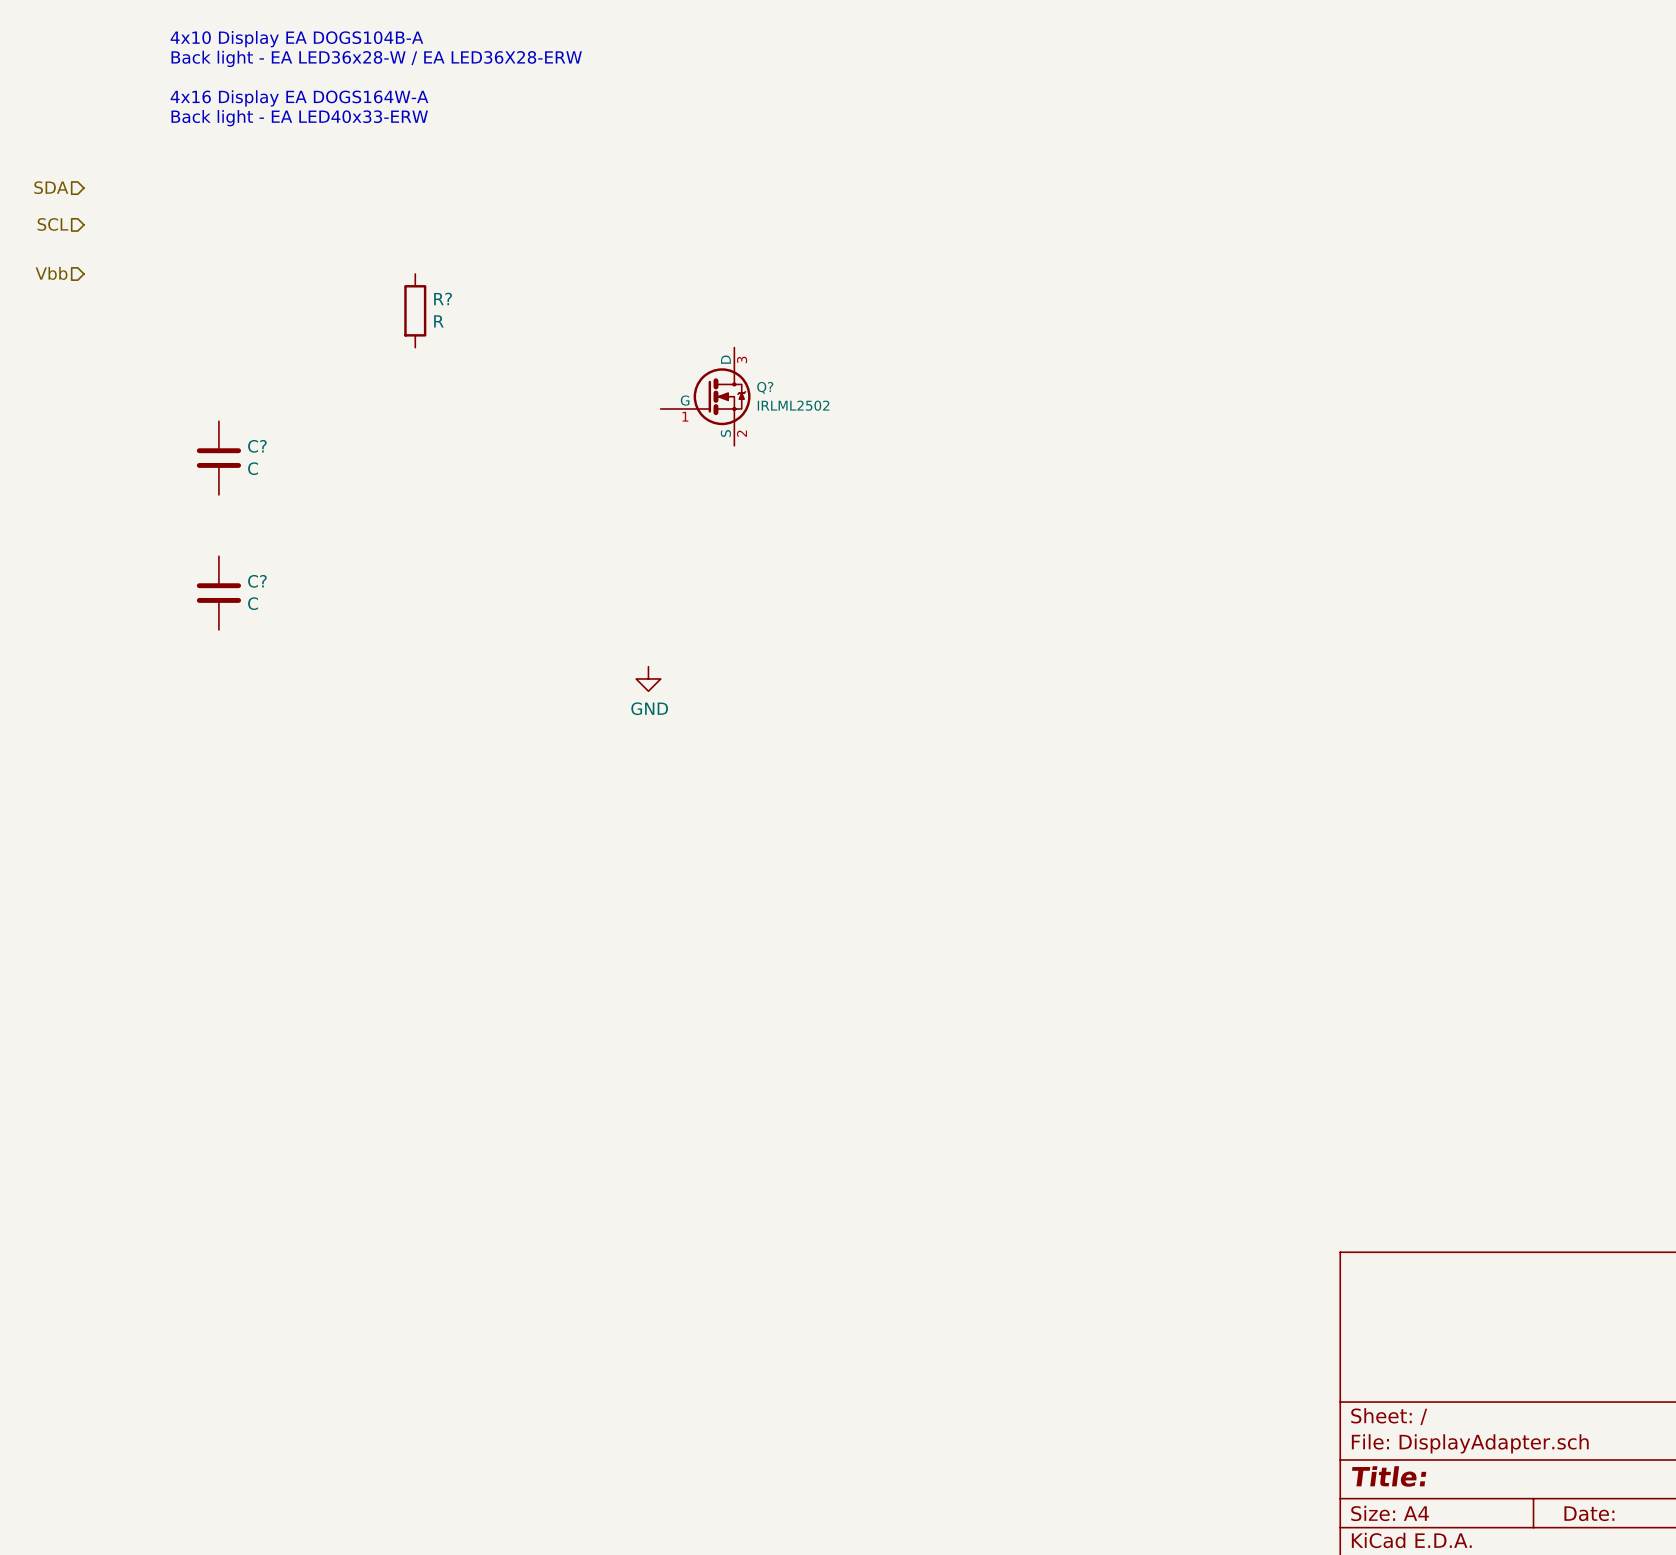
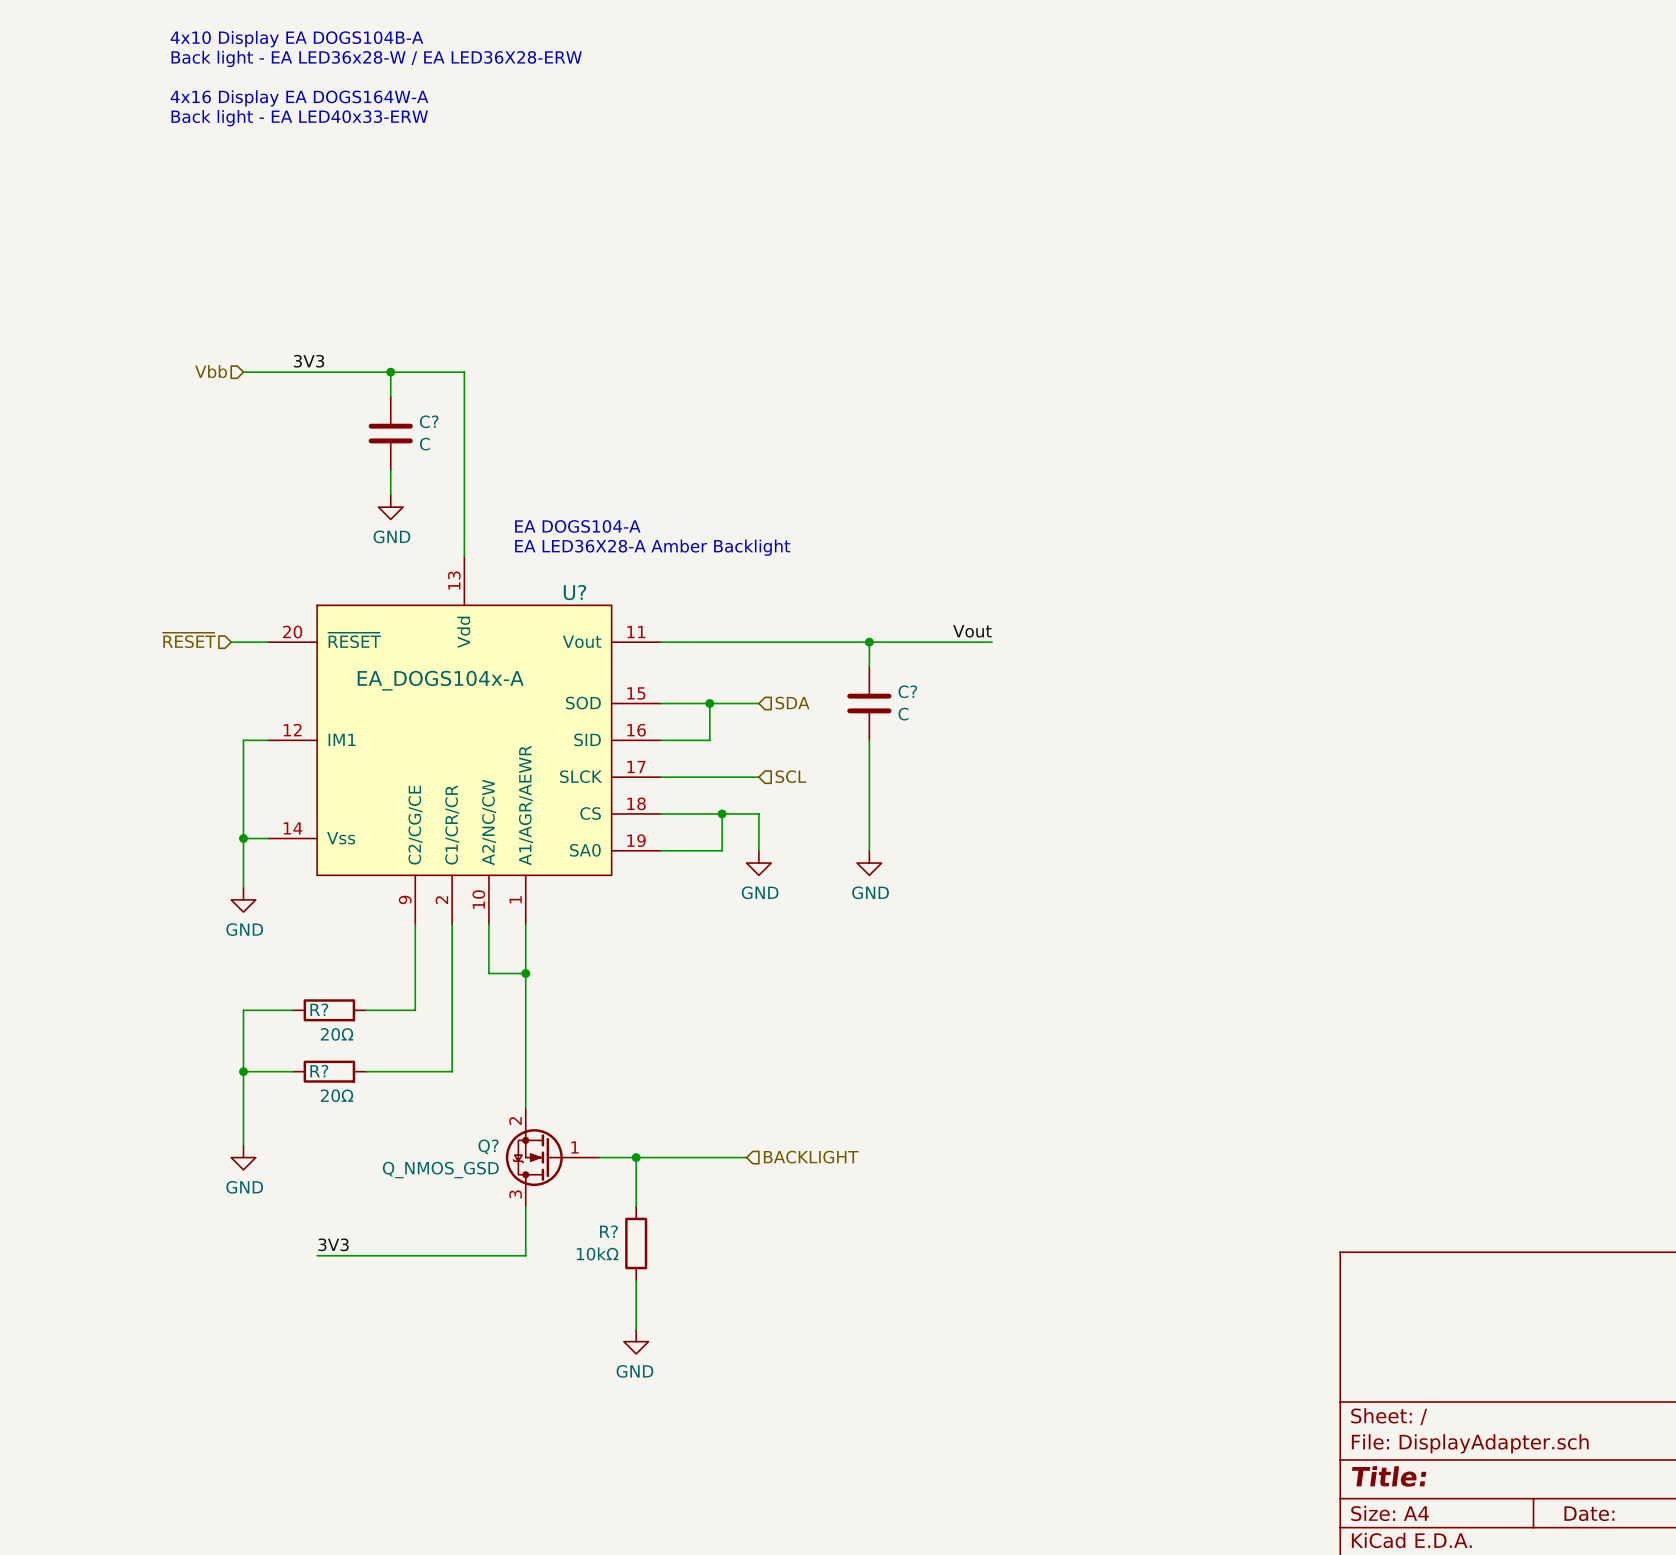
hierarchical label: SDA (51, 187) -> none
hierarchical label: SCL (52, 224) -> none
hierarchical label position: Vbb (51, 273) -> Vbb (211, 371)
R?: R (415, 310) -> none
label: none -> 3V3 (309, 361)
wire: none -> (243, 372) (464, 372) (464, 556)
wire: none -> (390, 372) (390, 396)
junction: none -> (390, 372)
Q?: IRLML2502 (705, 396) -> none
C?: none -> C (390, 433)
C?: C (218, 458) -> none
wire: none -> (390, 470) (390, 494)
power symbol: none -> GND (390, 507)
text: none -> EA DOGS104-A (577, 526)
text: none -> EA LED36X28-A Amber Backlight (652, 547)
C?: C (218, 593) -> none
label: none -> Vout (972, 631)
hierarchical label: none -> ~{RESET} (189, 640)
wire: none -> (231, 642) (268, 642)
wire: none -> (660, 642) (992, 642)
wire: none -> (869, 642) (869, 666)
junction: none -> (869, 642)
power symbol: GND (648, 678) -> none
wire: none -> (660, 703) (758, 703)
wire: none -> (709, 703) (709, 740) (660, 740)
junction: none -> (709, 703)
hierarchical label: none -> SDA (792, 703)
C?: none -> C (869, 703)
wire: none -> (268, 740) (243, 740) (243, 887)
U?: none -> EA_DOGS104x-A (464, 740)
wire: none -> (869, 740) (869, 850)
hierarchical label: none -> SCL (790, 776)
wire: none -> (660, 777) (758, 777)
wire: none -> (660, 813) (758, 813) (758, 850)
wire: none -> (722, 813) (722, 850) (660, 850)
junction: none -> (722, 813)
wire: none -> (243, 838) (268, 838)
junction: none -> (243, 838)
power symbol: none -> GND (758, 863)
power symbol: none -> GND (869, 863)
power symbol: none -> GND (243, 899)
wire: none -> (415, 924) (415, 1010) (366, 1010)
wire: none -> (452, 924) (452, 1071) (366, 1071)
wire: none -> (488, 924) (488, 973) (525, 973)
wire: none -> (525, 924) (525, 1108)
junction: none -> (525, 973)
wire: none -> (292, 1010) (243, 1010) (243, 1145)
R?: none -> 20Ω (329, 1010)
wire: none -> (243, 1071) (292, 1071)
junction: none -> (243, 1071)
R?: none -> 20Ω (329, 1071)
power symbol: none -> GND (243, 1157)
Q?: none -> Q_NMOS_GSD (552, 1157)
wire: none -> (599, 1157) (746, 1157)
wire: none -> (636, 1157) (636, 1206)
junction: none -> (636, 1157)
hierarchical label: none -> BACKLIGHT (811, 1157)
wire: none -> (525, 1206) (525, 1255) (317, 1255)
R?: none -> 10kΩ (636, 1243)
label: none -> 3V3 (333, 1244)
wire: none -> (636, 1280) (636, 1329)
power symbol: none -> GND (636, 1341)

